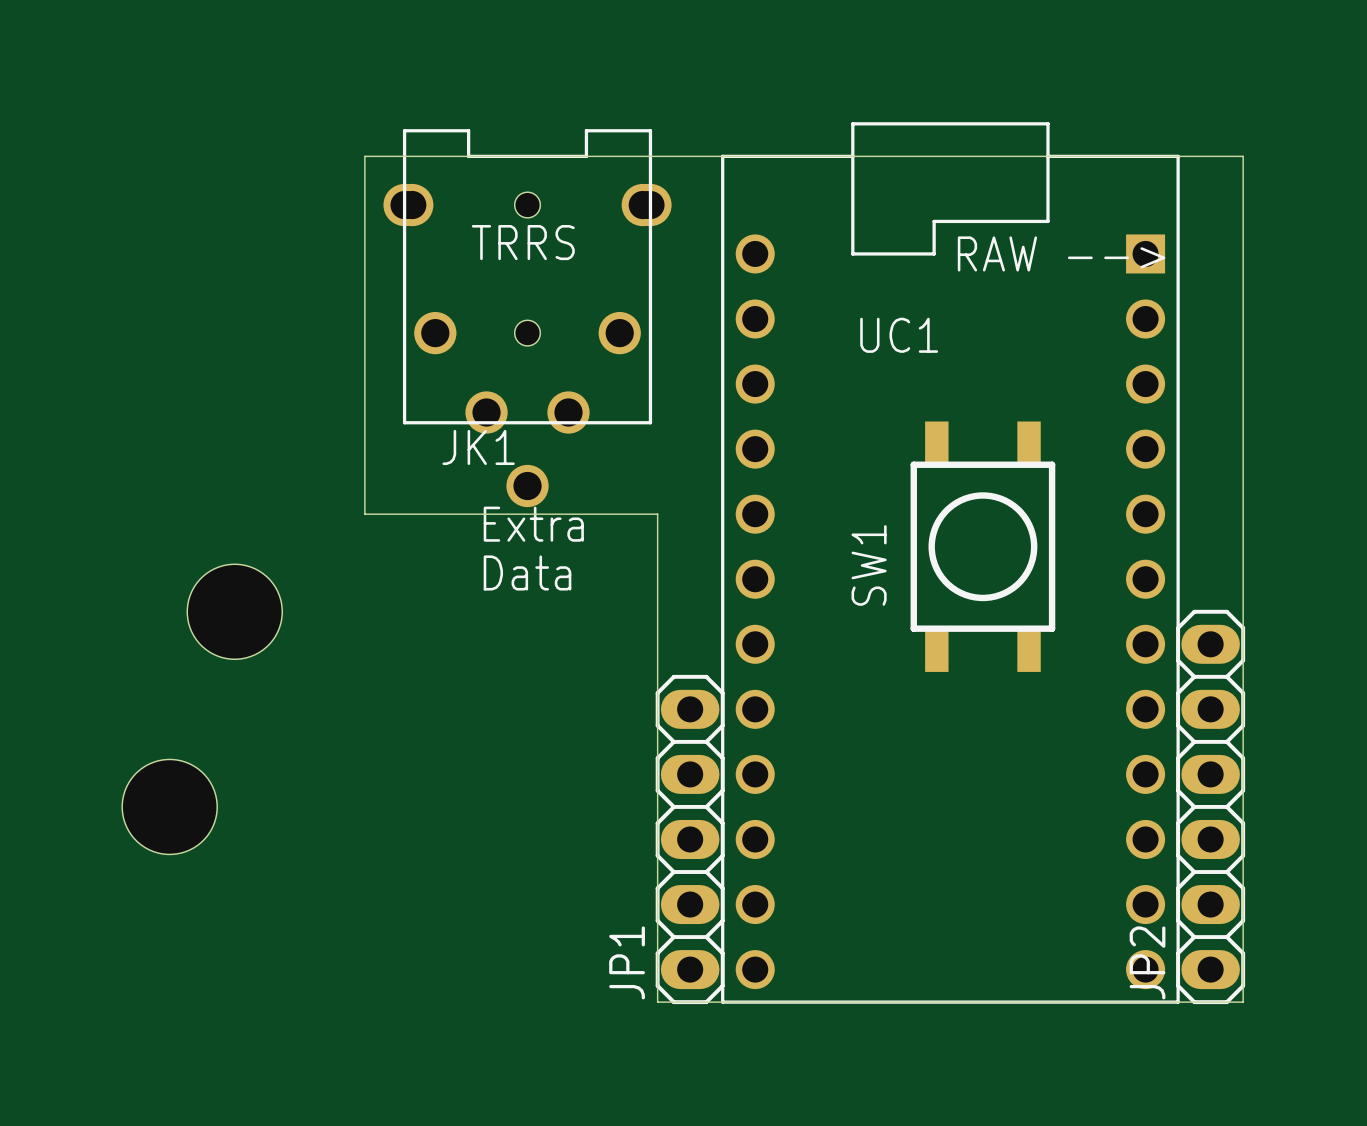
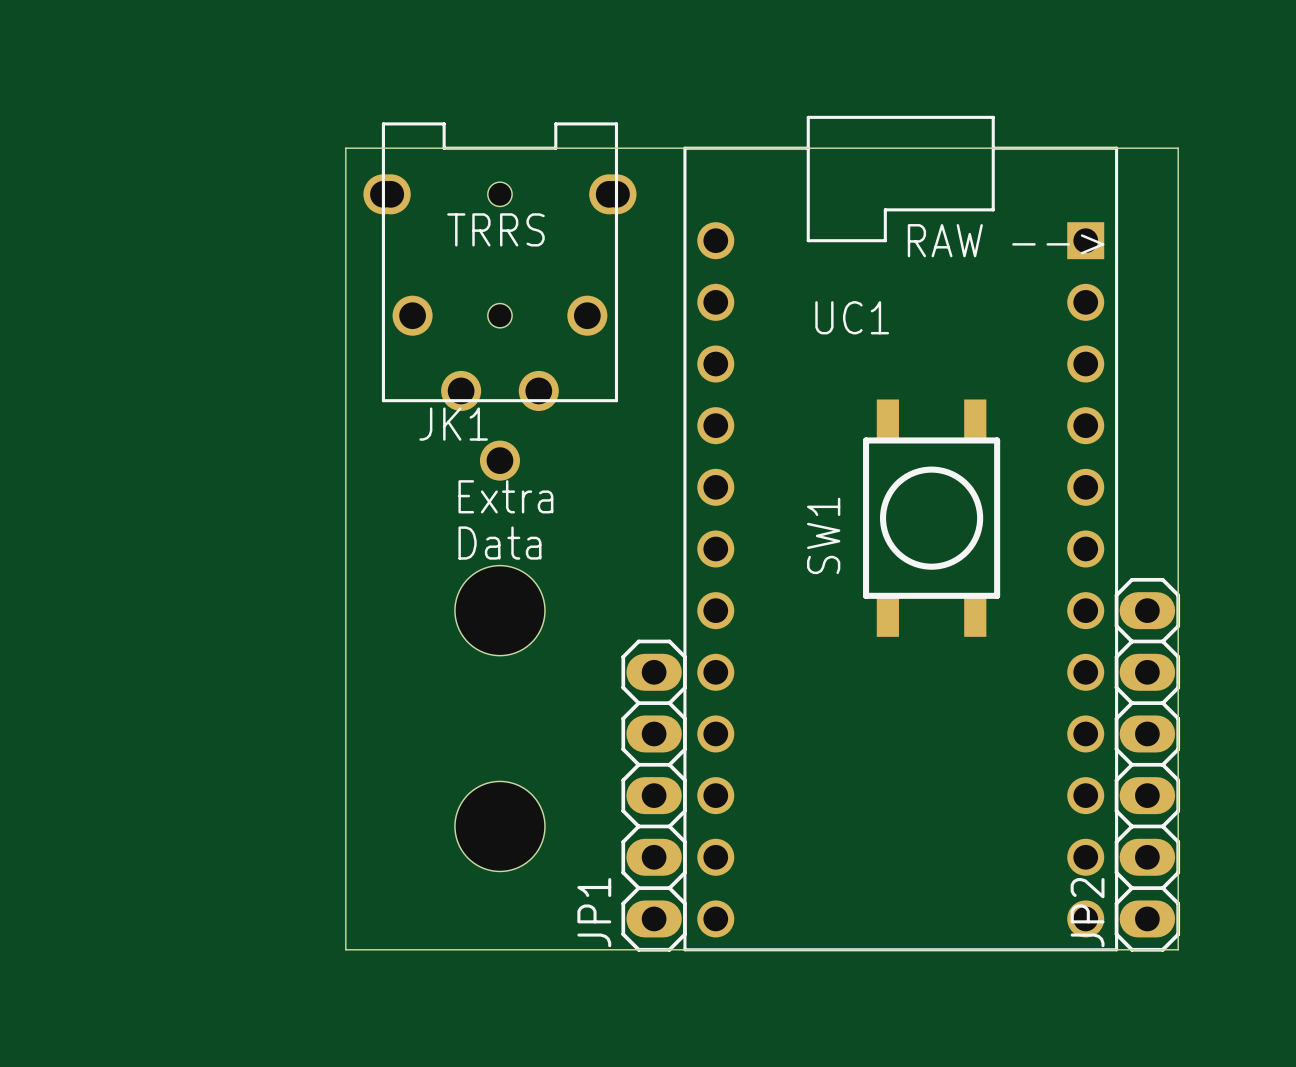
board edge: (364, 514) (657, 514) (657, 1002) -> (345, 487) (345, 949) (623, 949)
hole: (234, 611) -> none
hole: none -> (499, 610)
hole: (169, 806) -> none
hole: none -> (499, 826)

